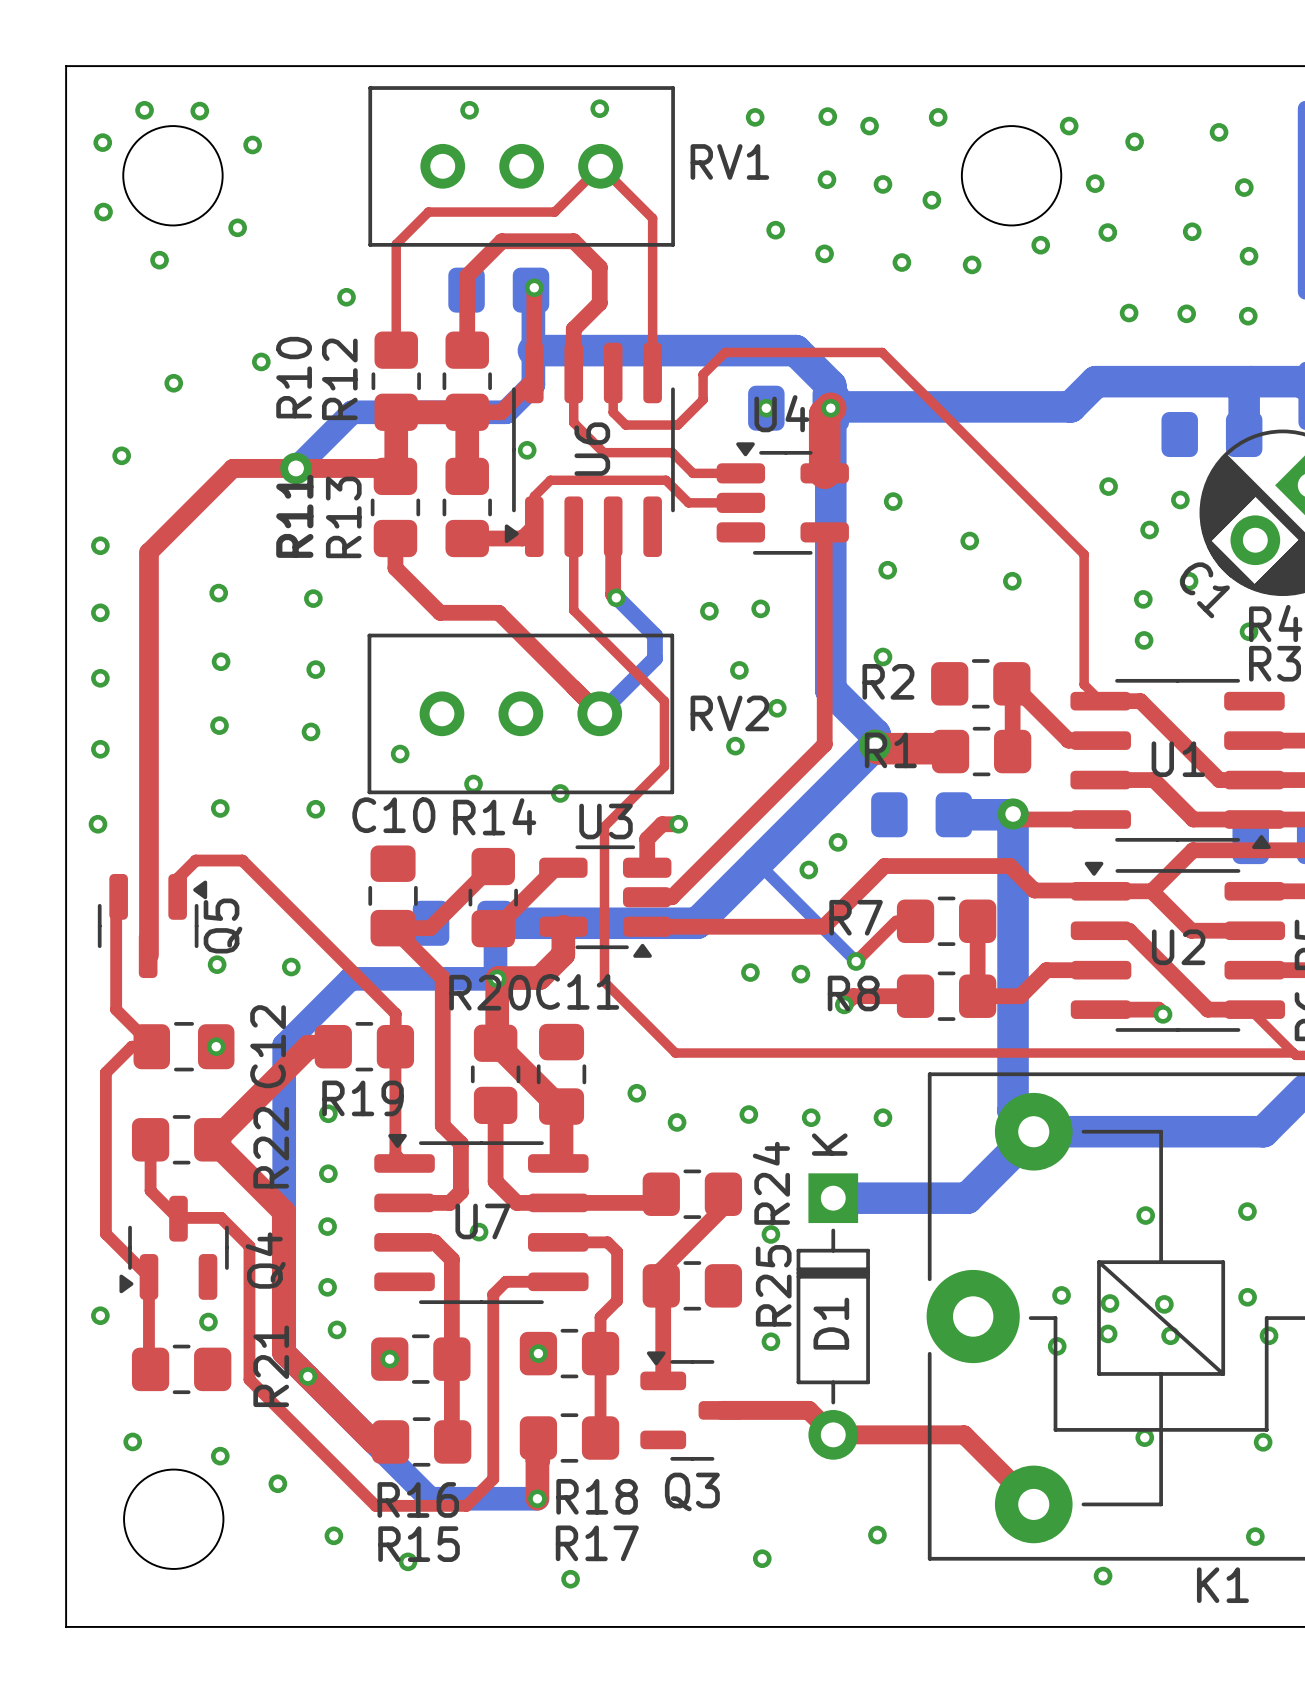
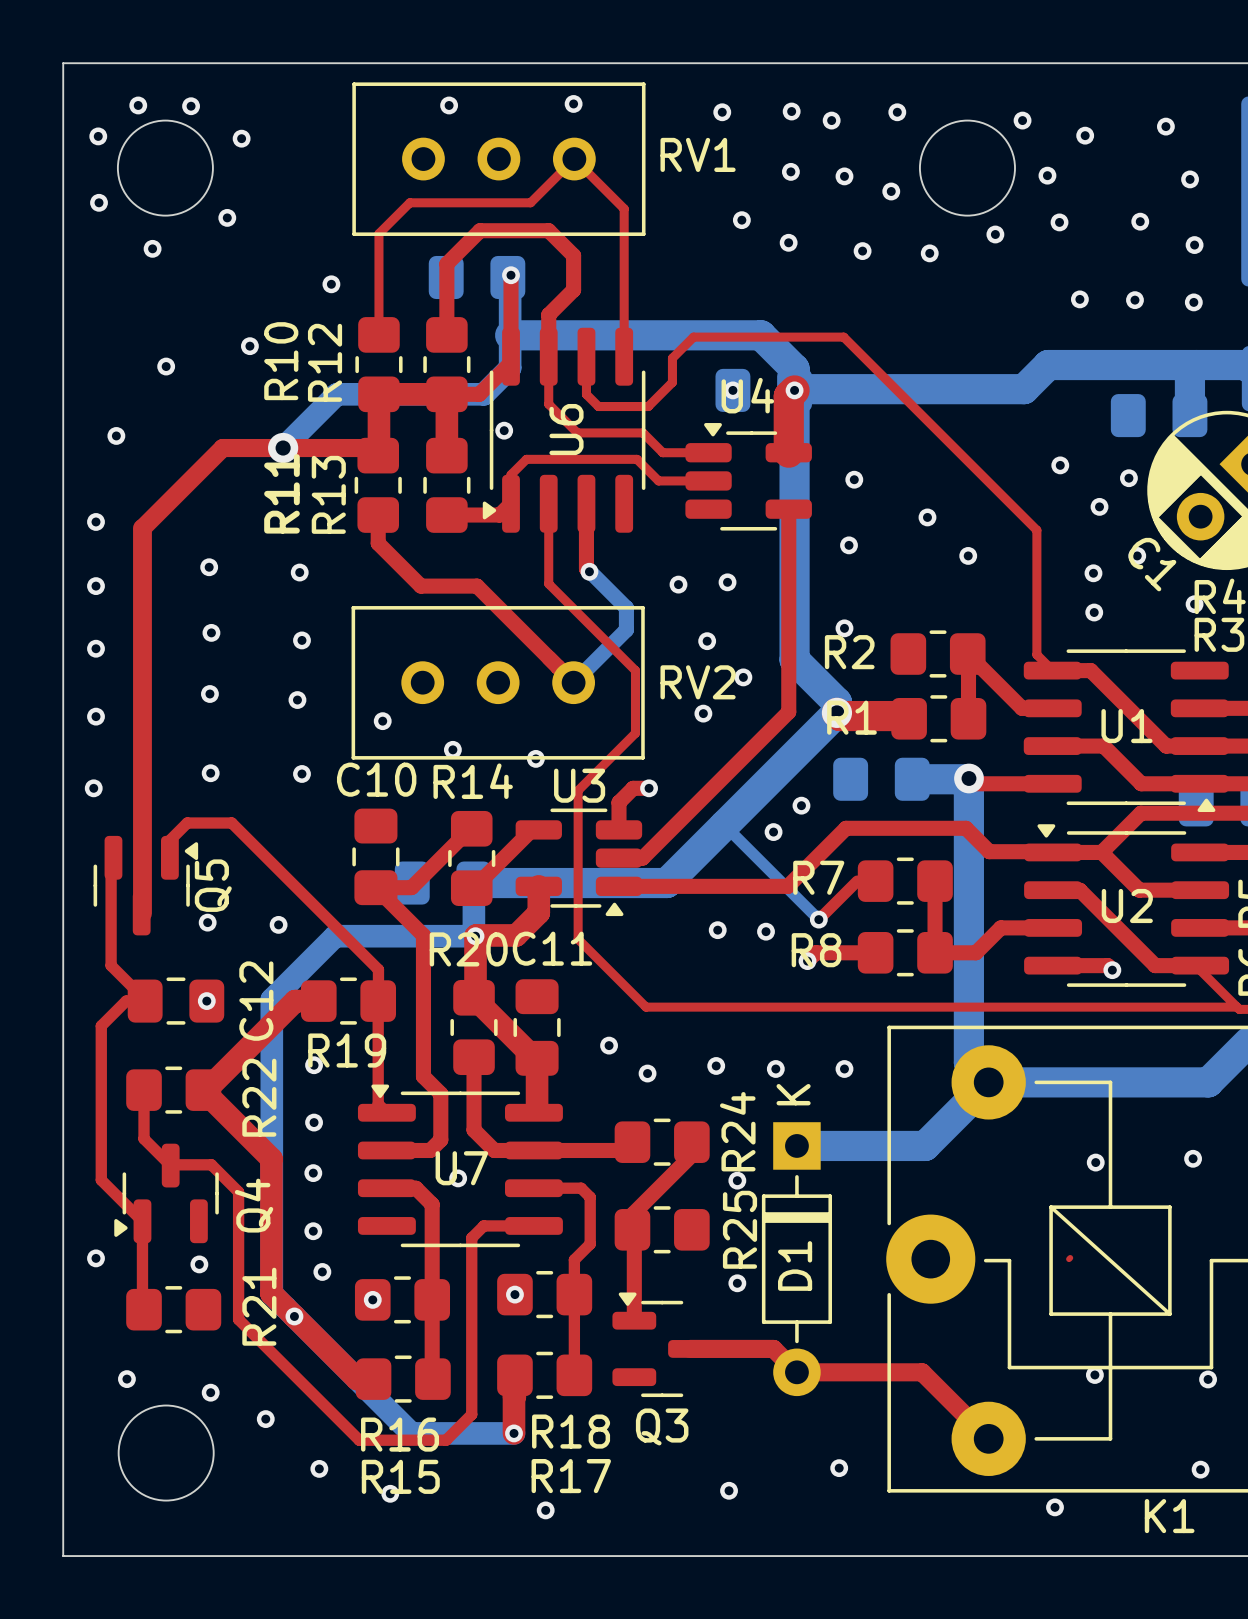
via: (1061, 1295) -> none
via: (1247, 1297) -> none
via: (1110, 1303) -> none
via: (1164, 1304) -> none
top track: none -> (1070, 1257) (1069, 1259)
via: (1108, 1333) -> none
via: (1170, 1335) -> none
via: (1269, 1335) -> none
via: (1057, 1346) -> none

